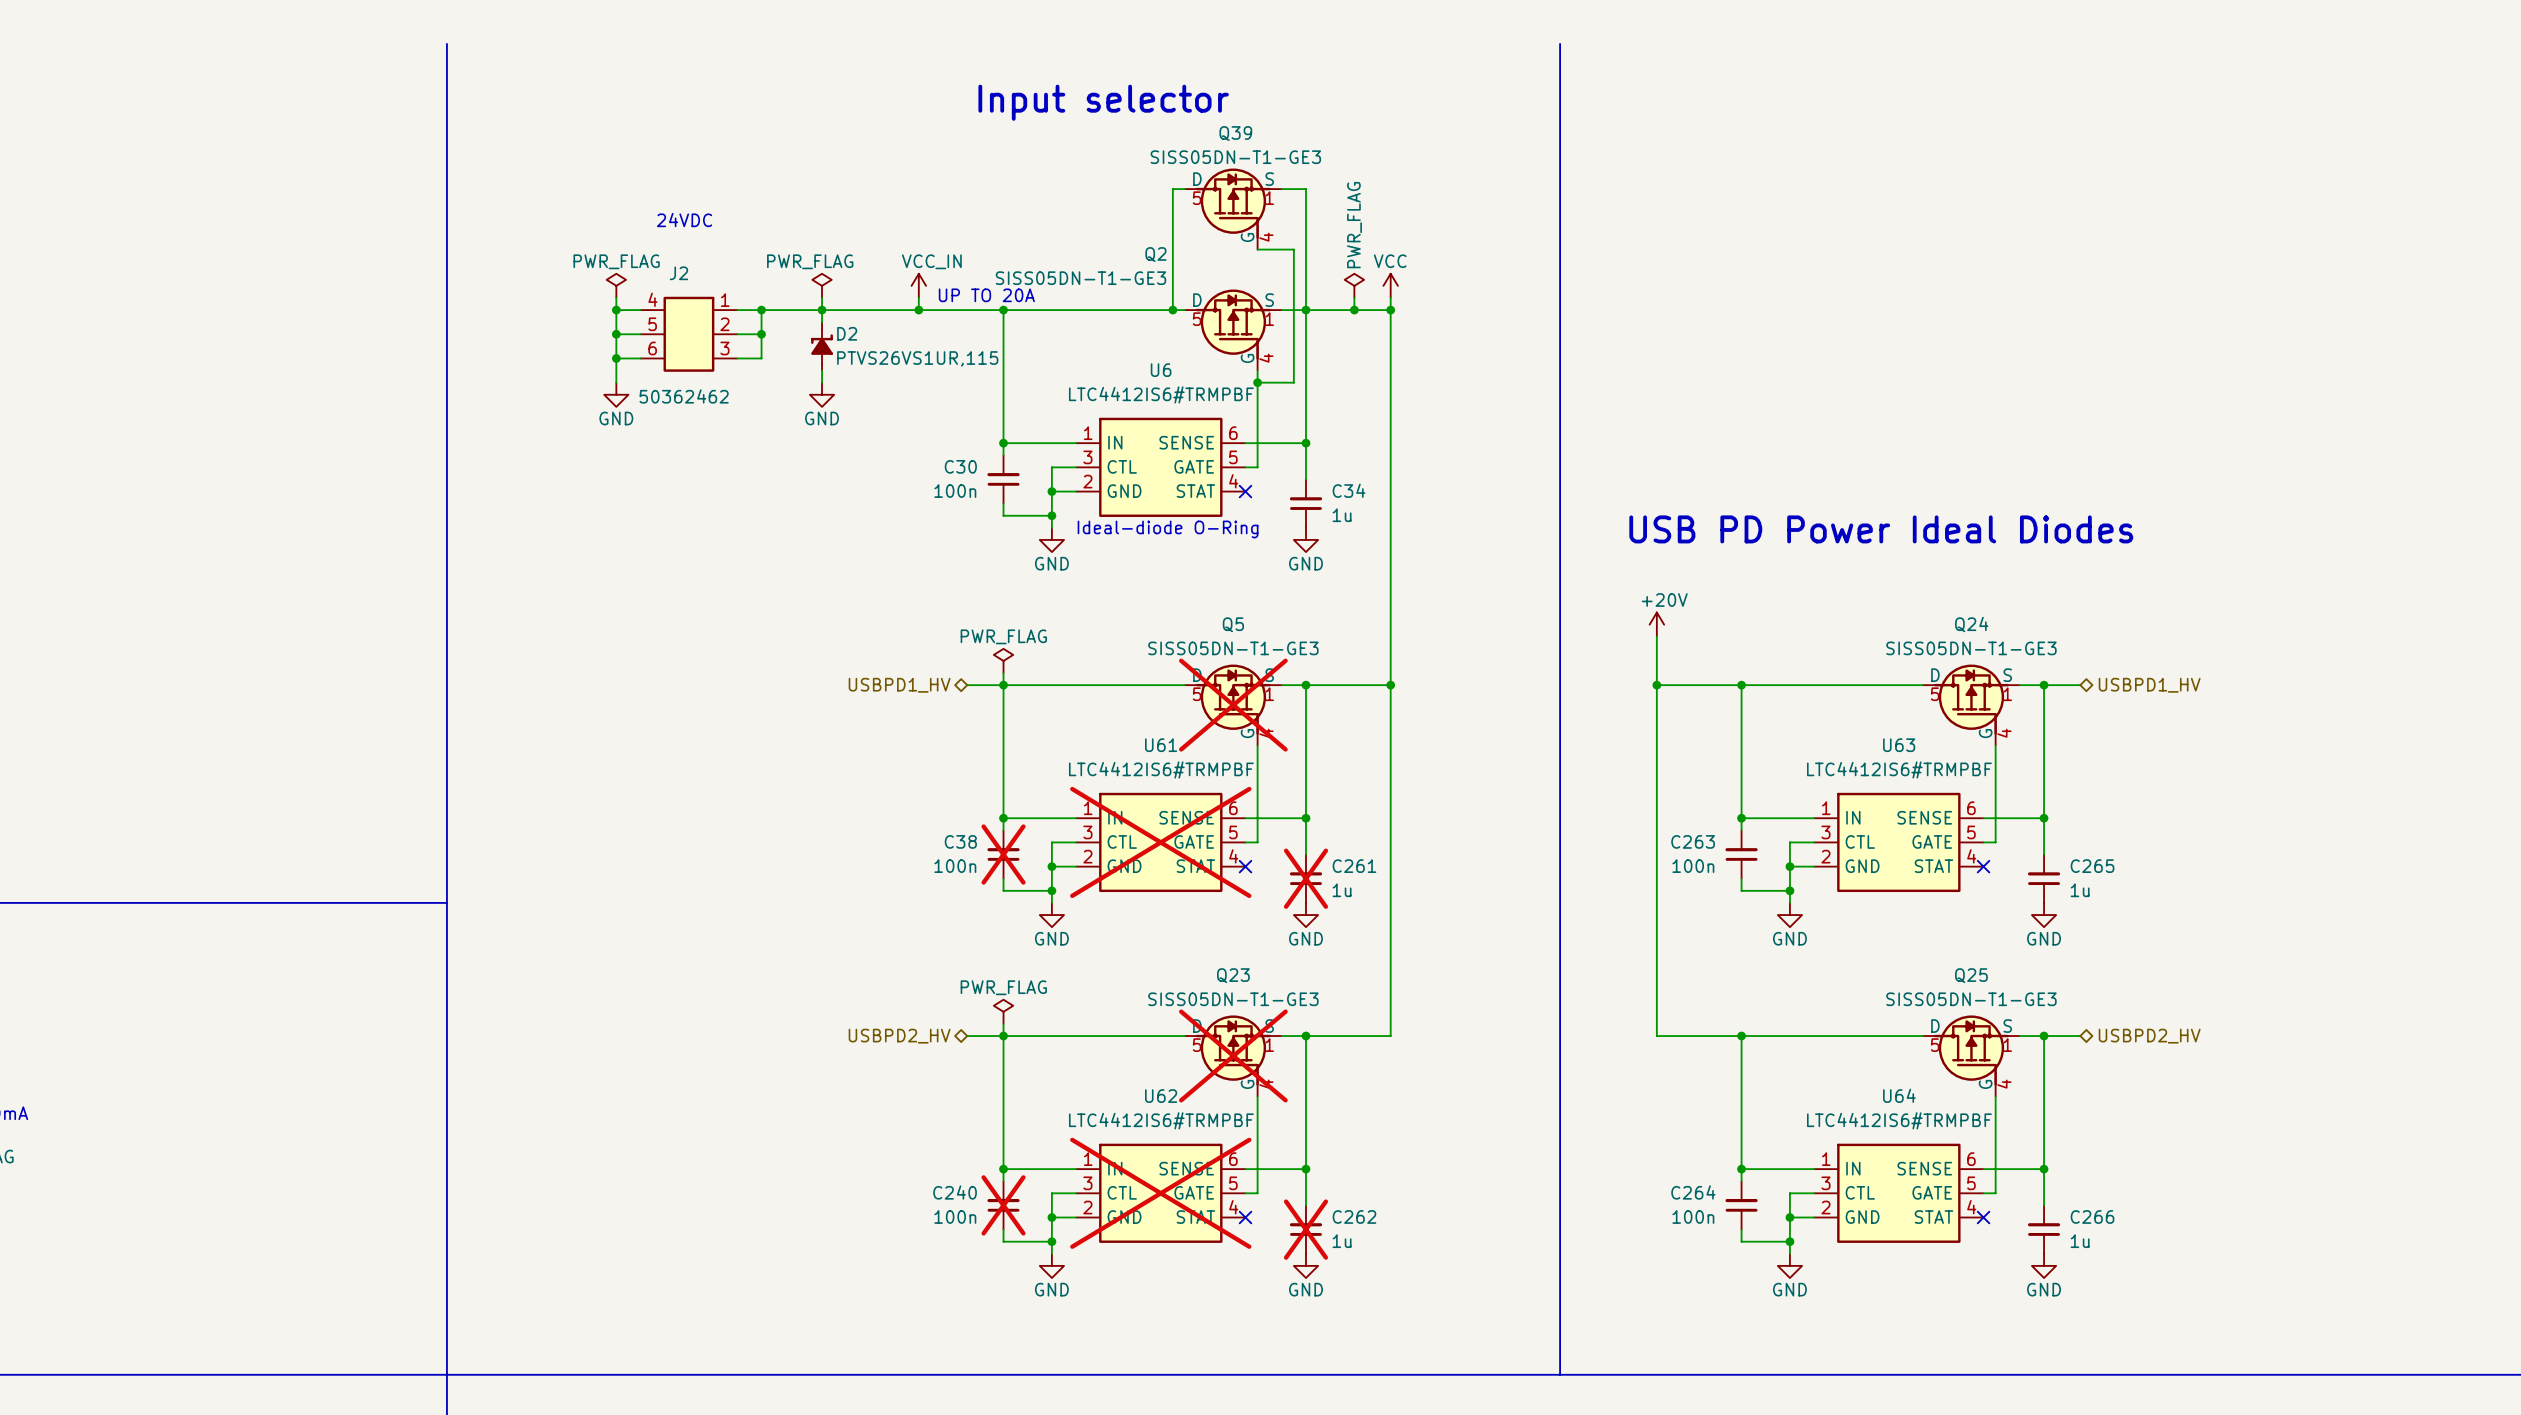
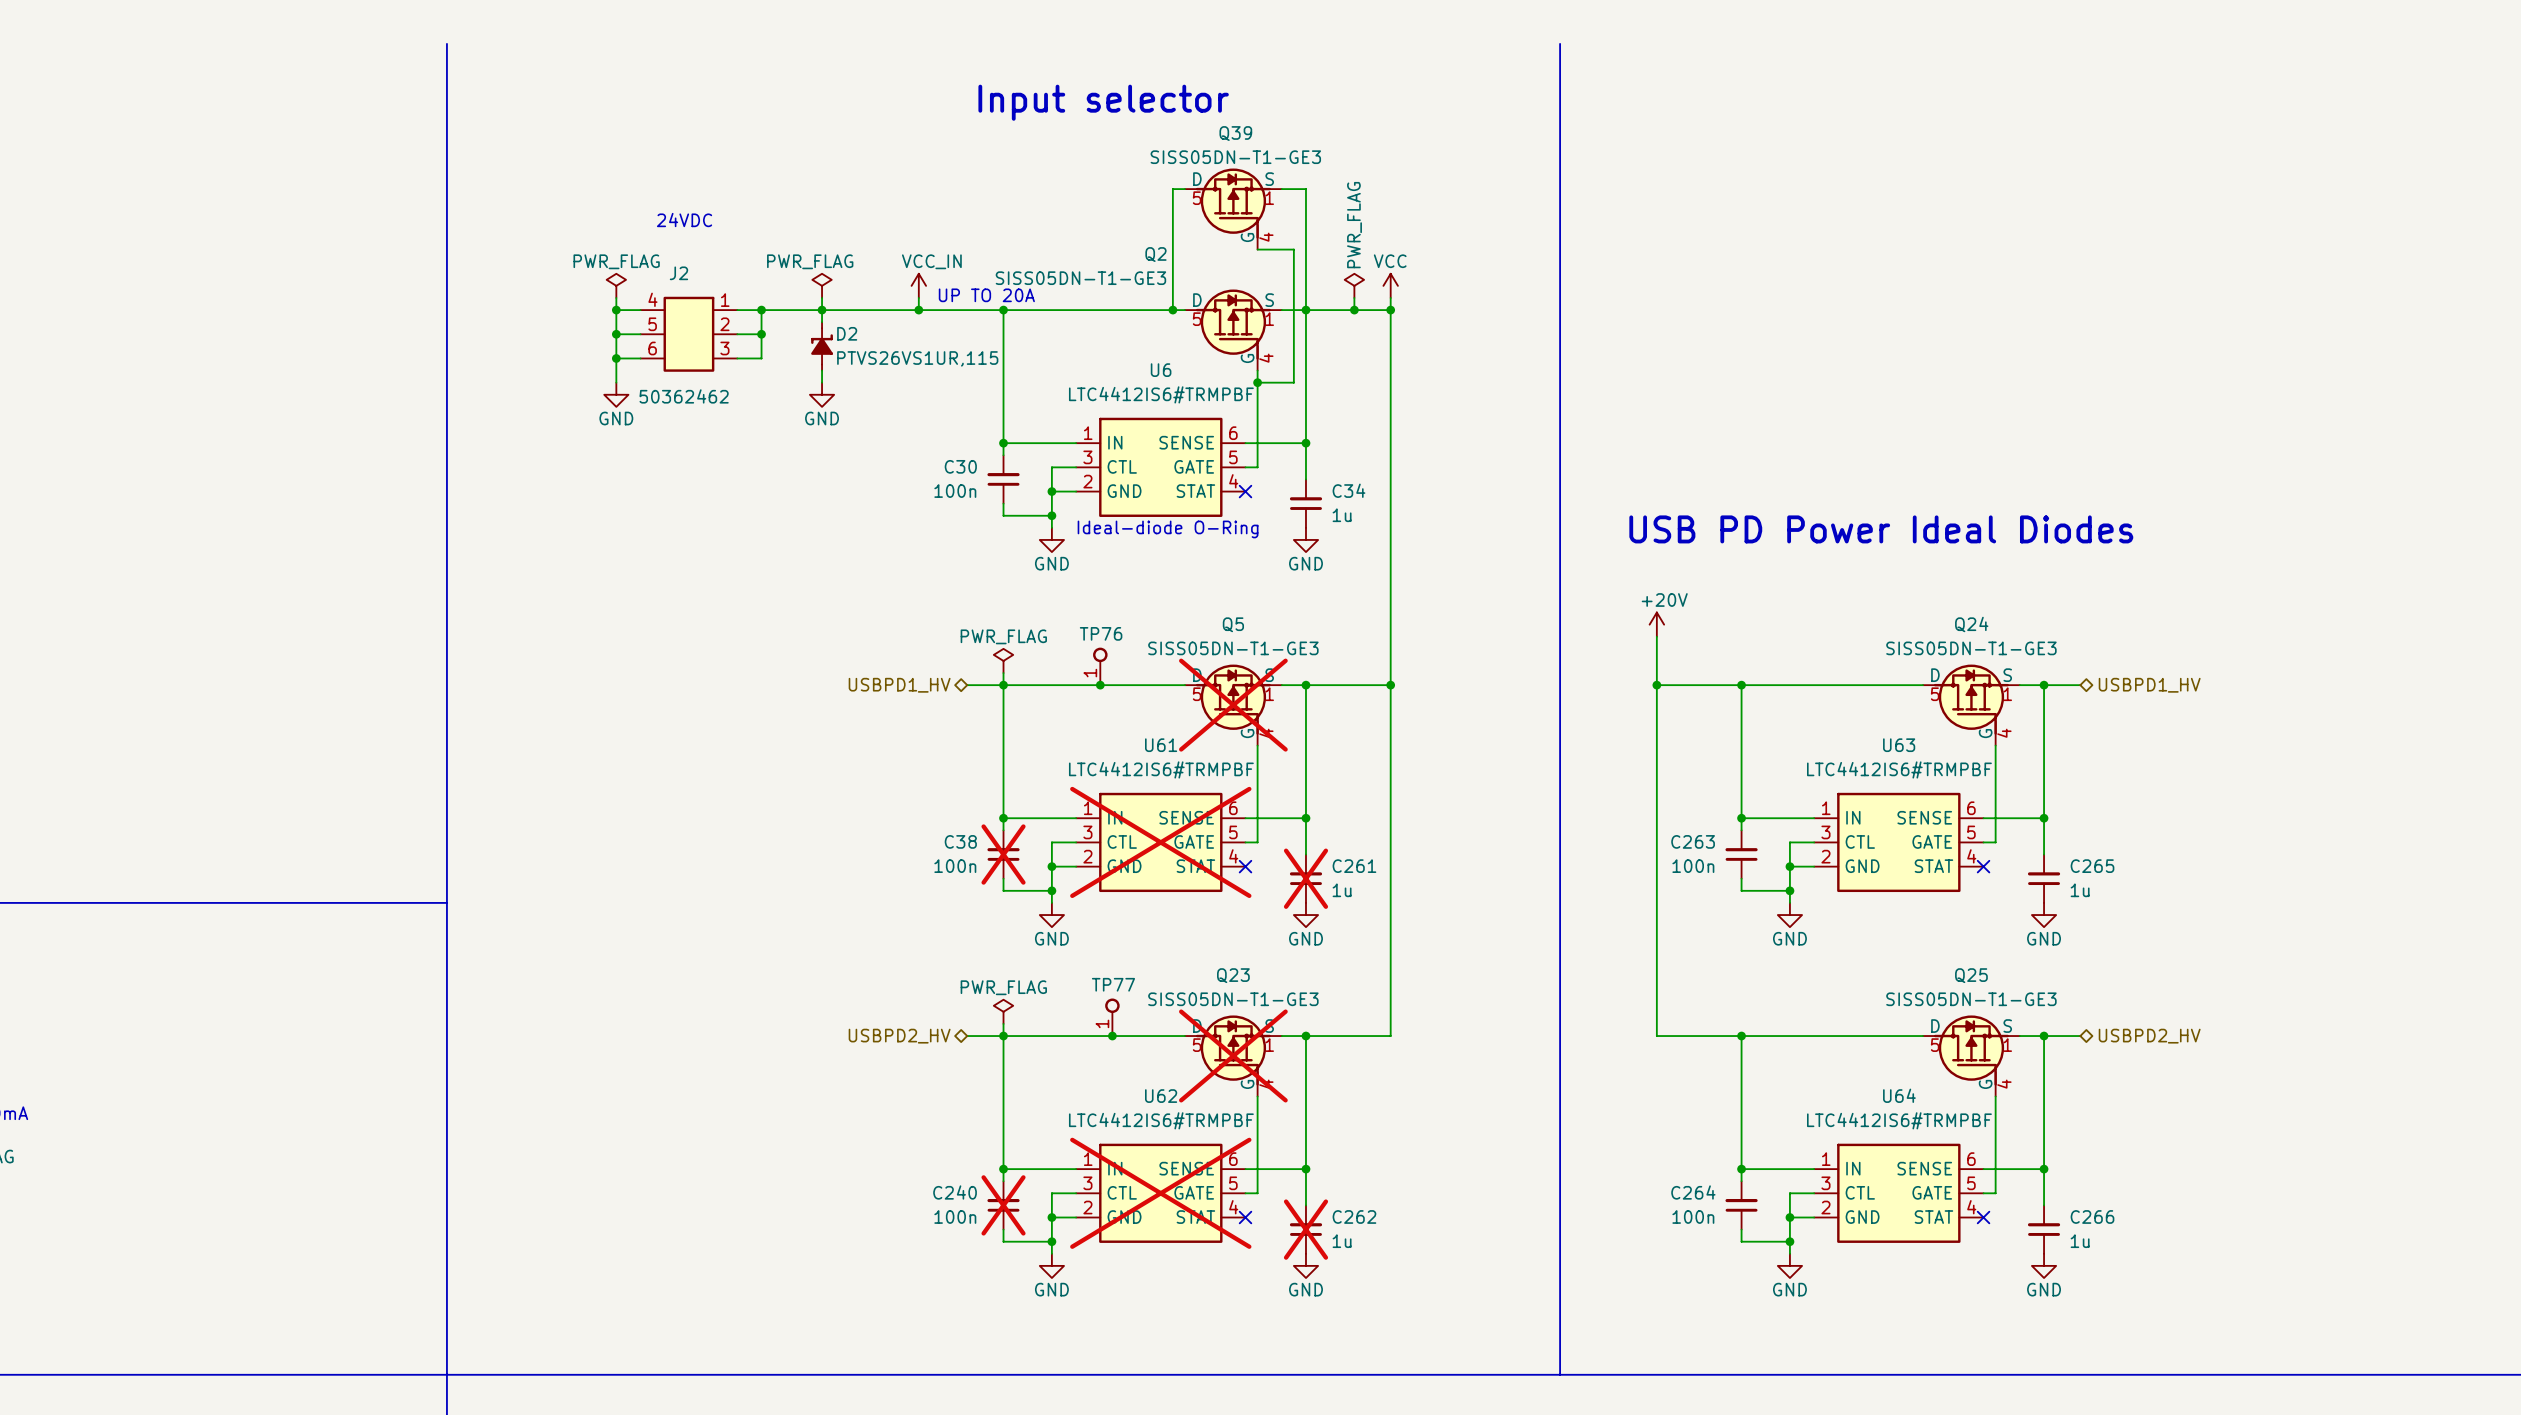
TP76: none -> (1100, 666)
junction: none -> (1100, 685)
TP77: none -> (1112, 1017)
junction: none -> (1112, 1036)

